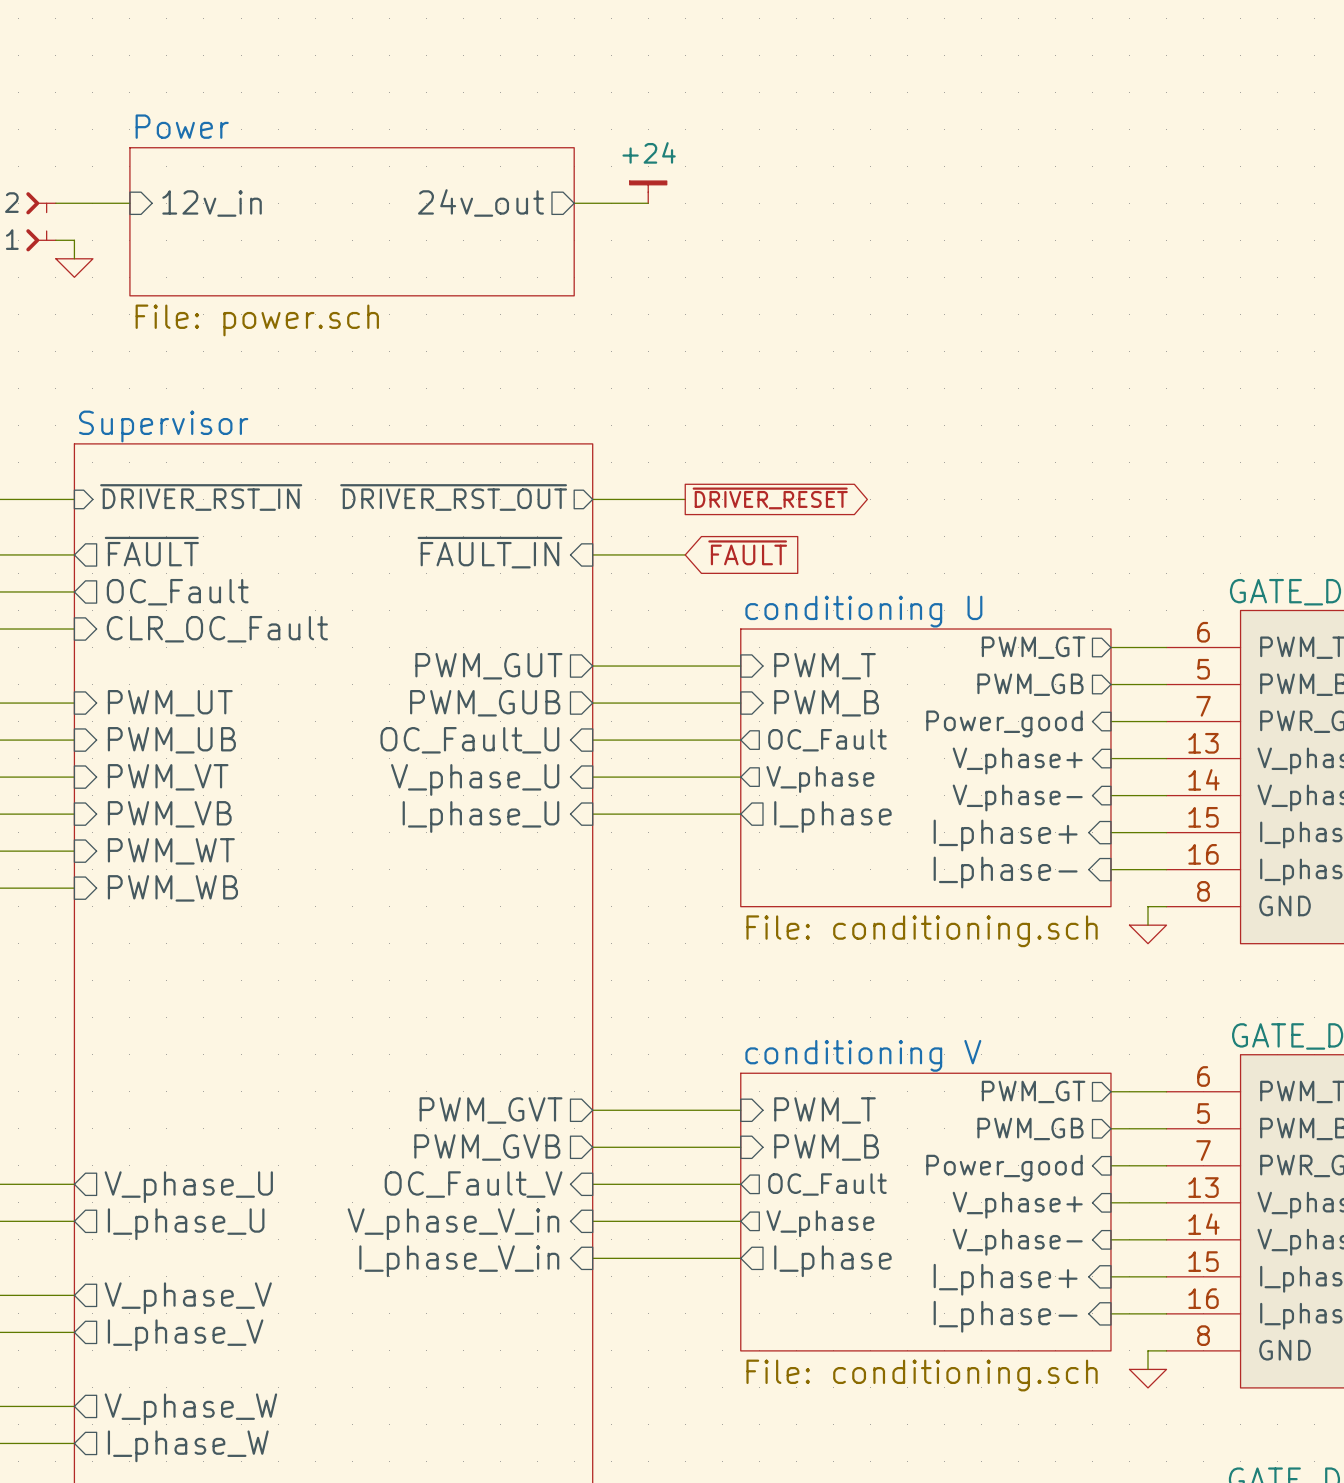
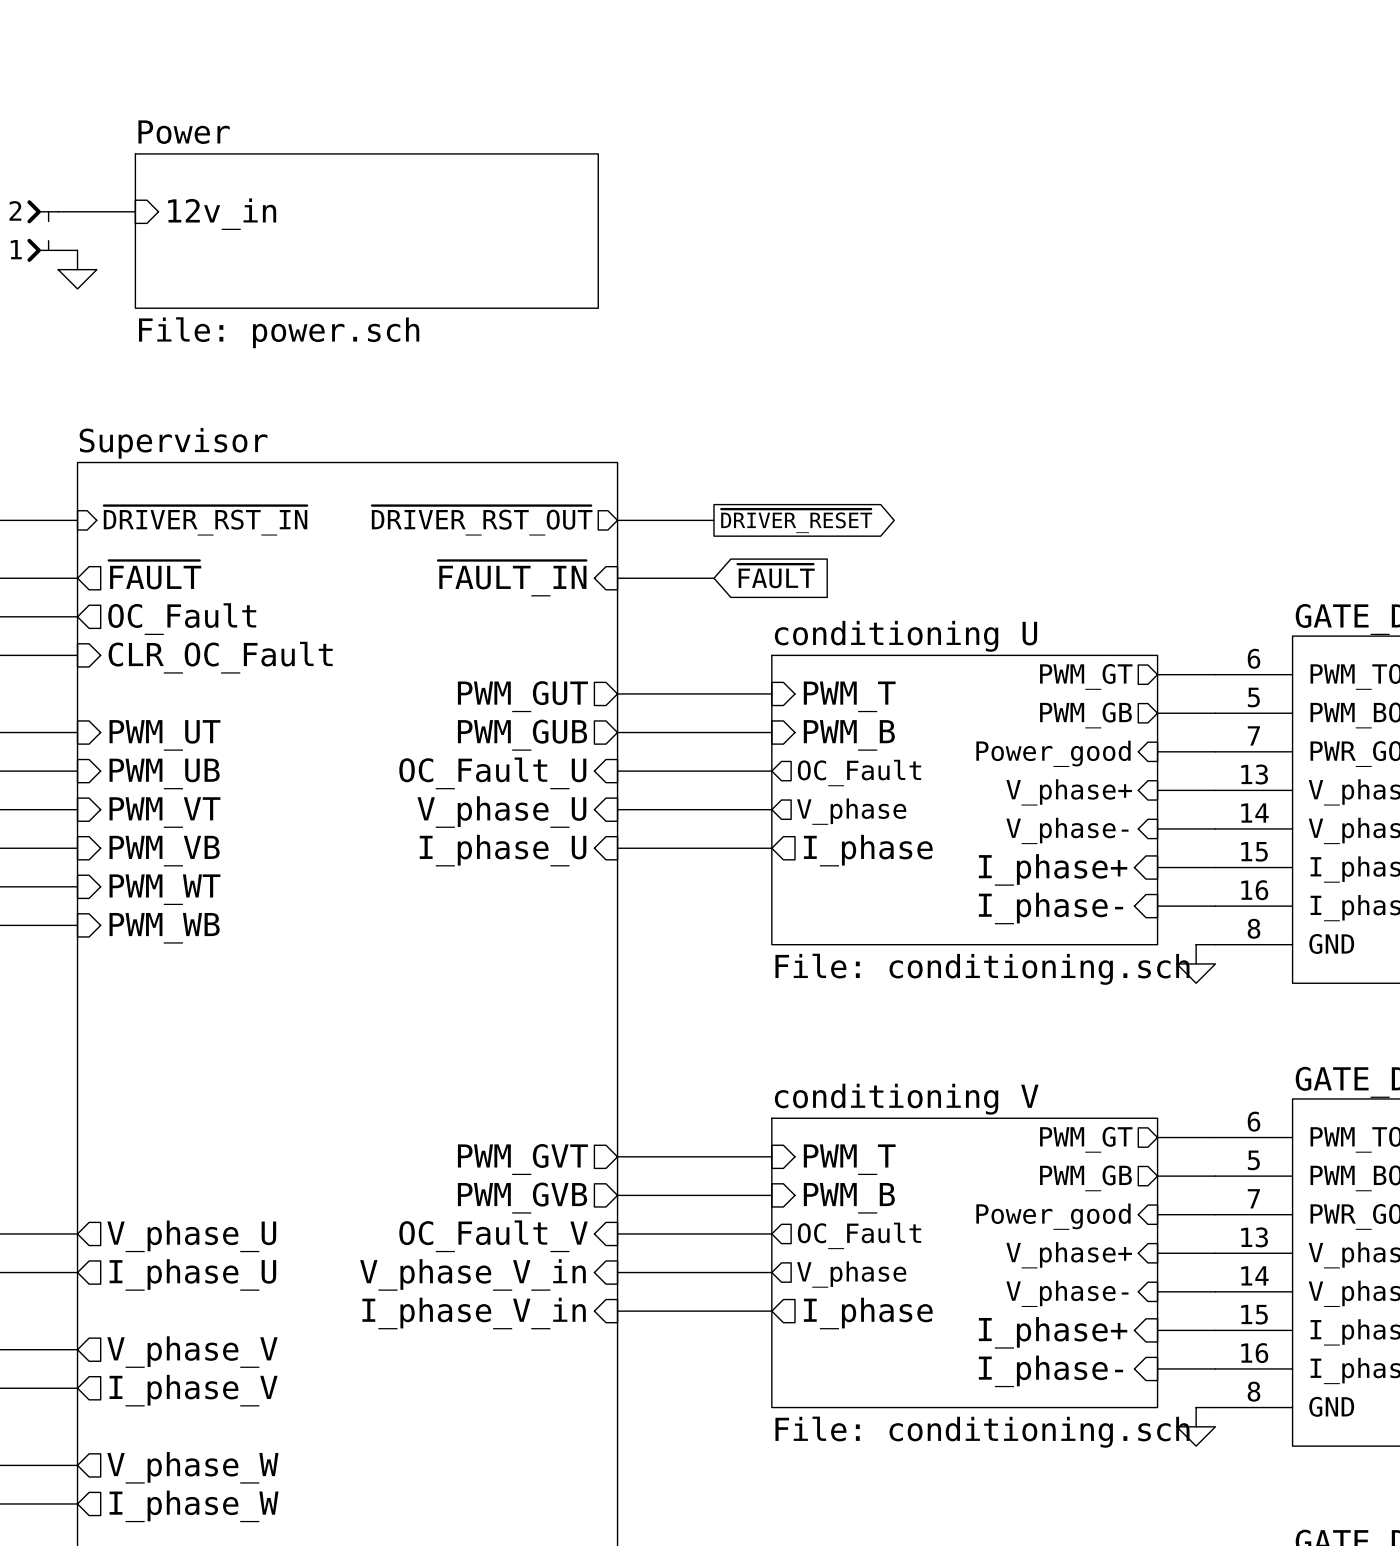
power symbol: +24 (648, 192) -> none
sheet pin: 24v_out (480, 202) -> none
wire: (574, 203) (648, 203) -> none

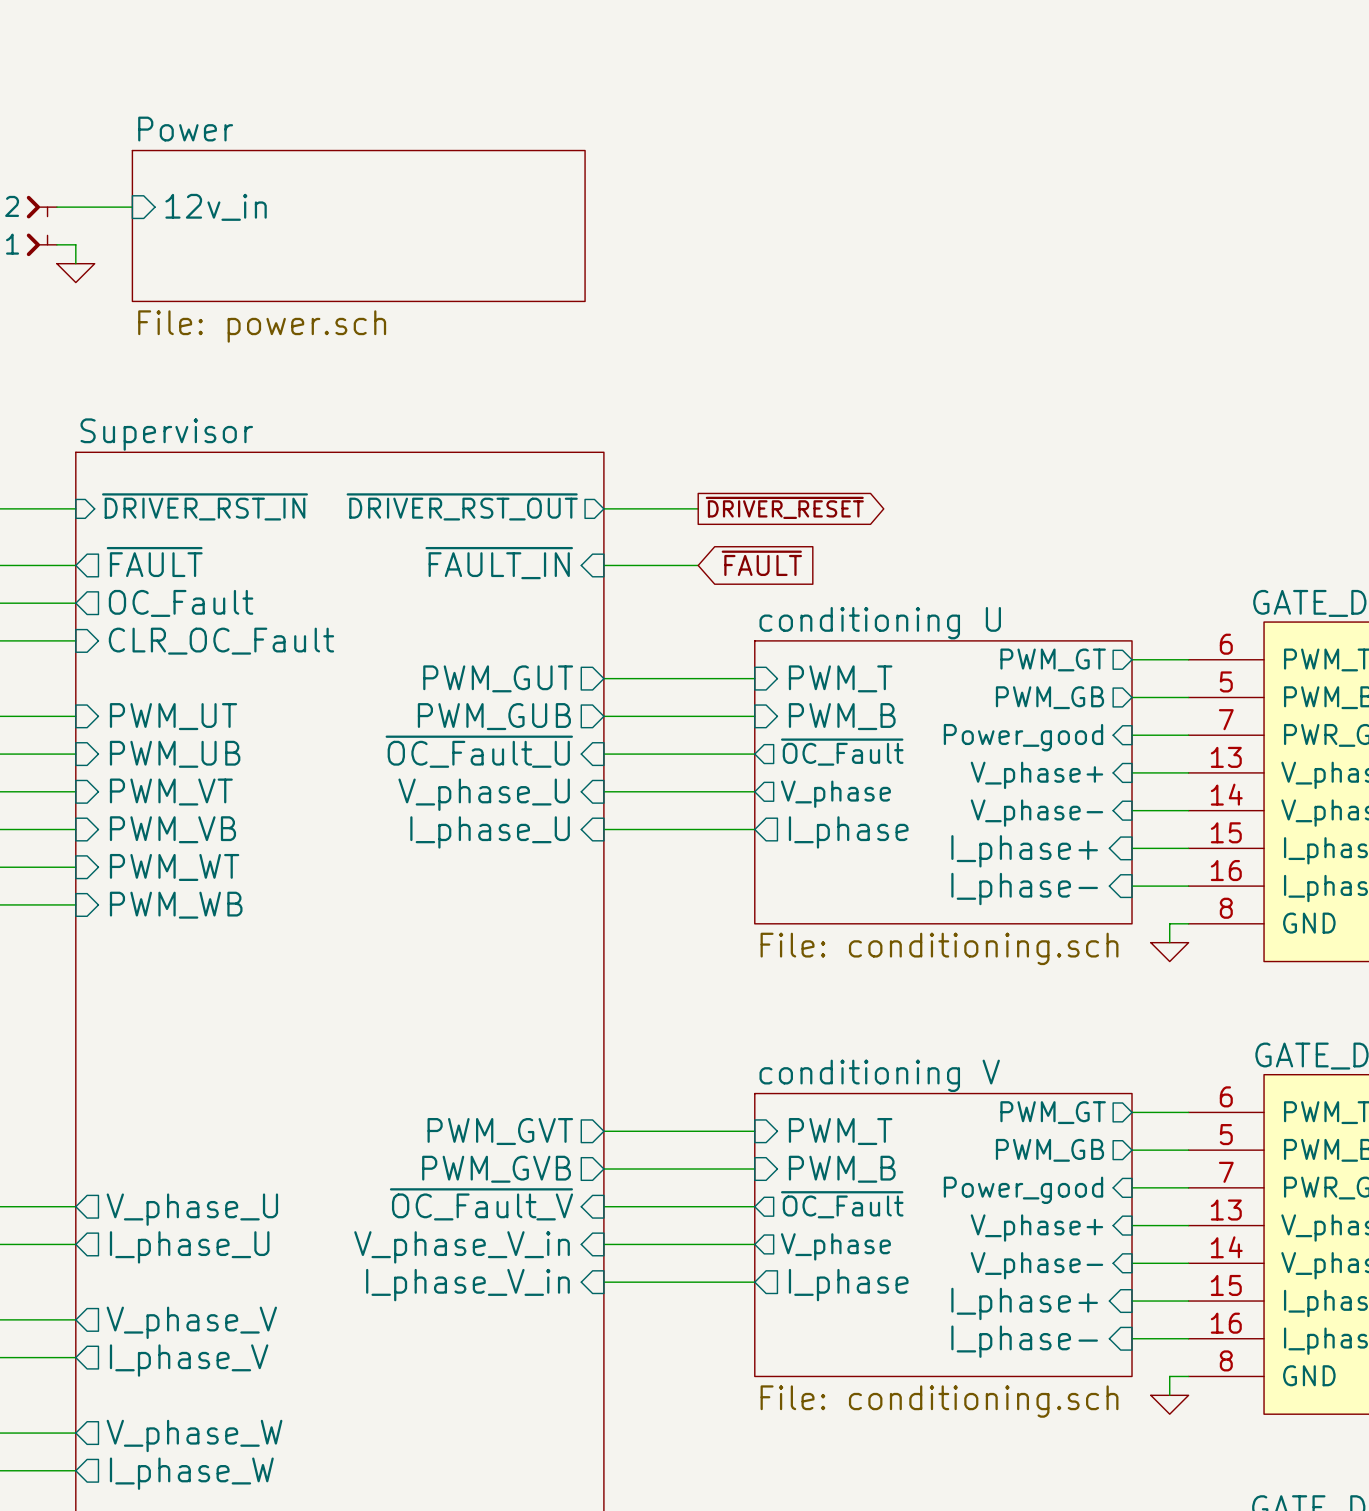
sheet pin: OC_Fault_U (492, 773) -> ~{OC_Fault_U} (479, 751)
sheet pin: OC_Fault (859, 773) -> ~{OC_Fault} (842, 752)
sheet pin: OC_Fault (859, 1235) -> ~{OC_Fault} (842, 1204)
sheet pin: OC_Fault_V (493, 1236) -> ~{OC_Fault_V} (481, 1204)

